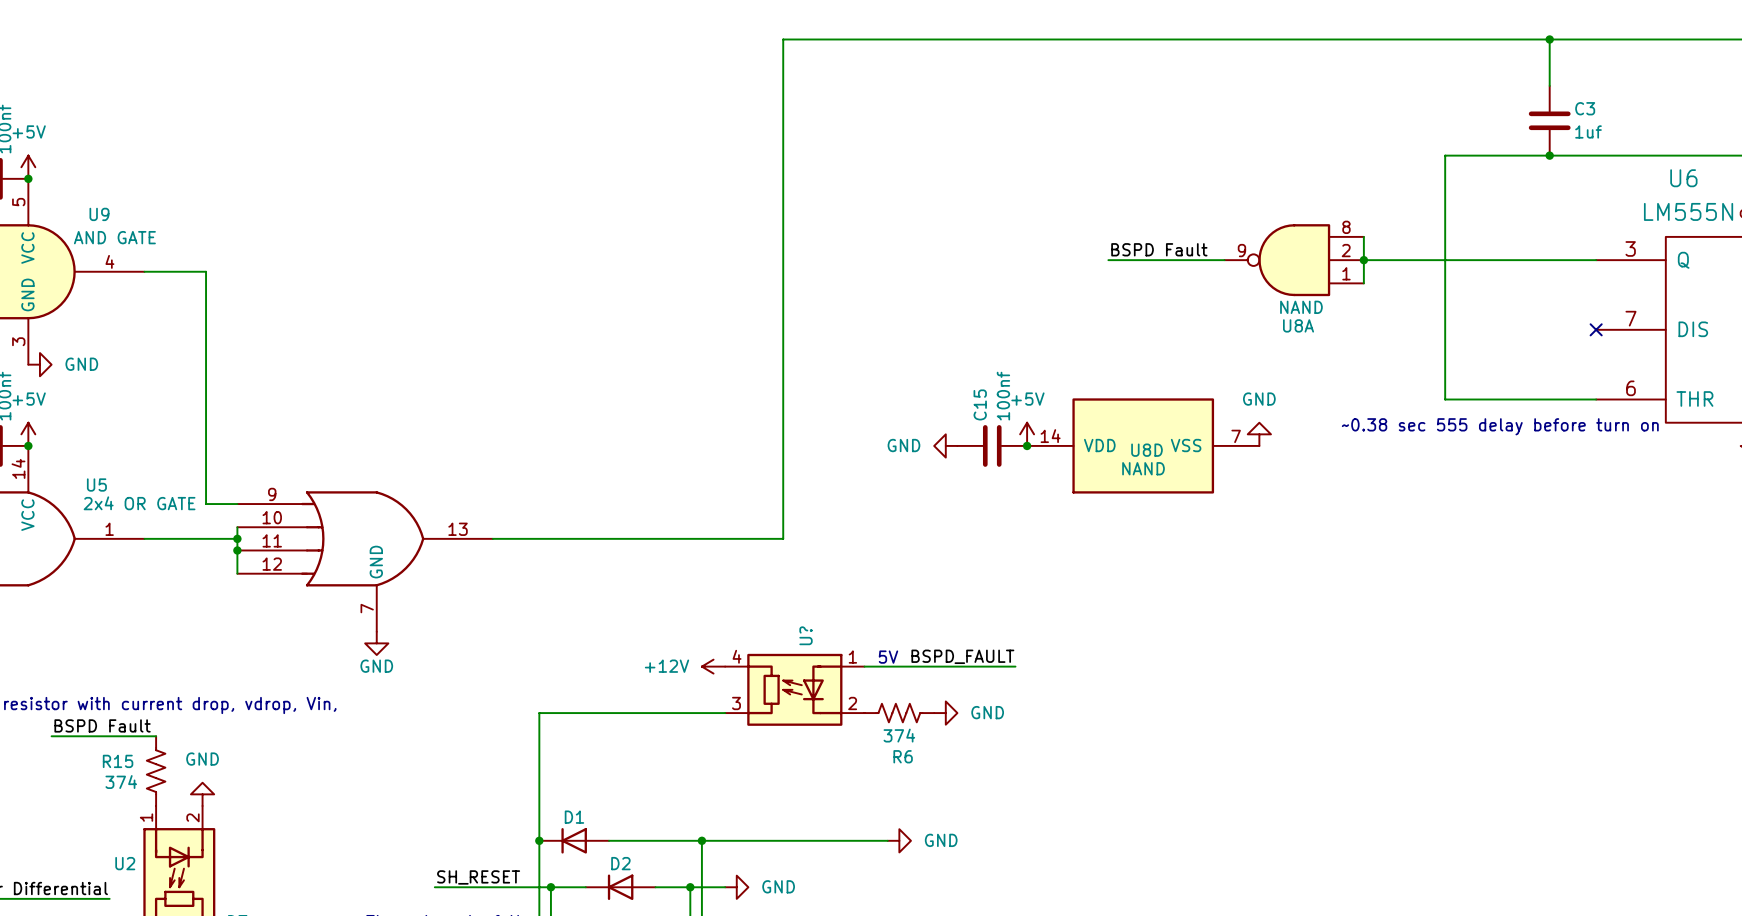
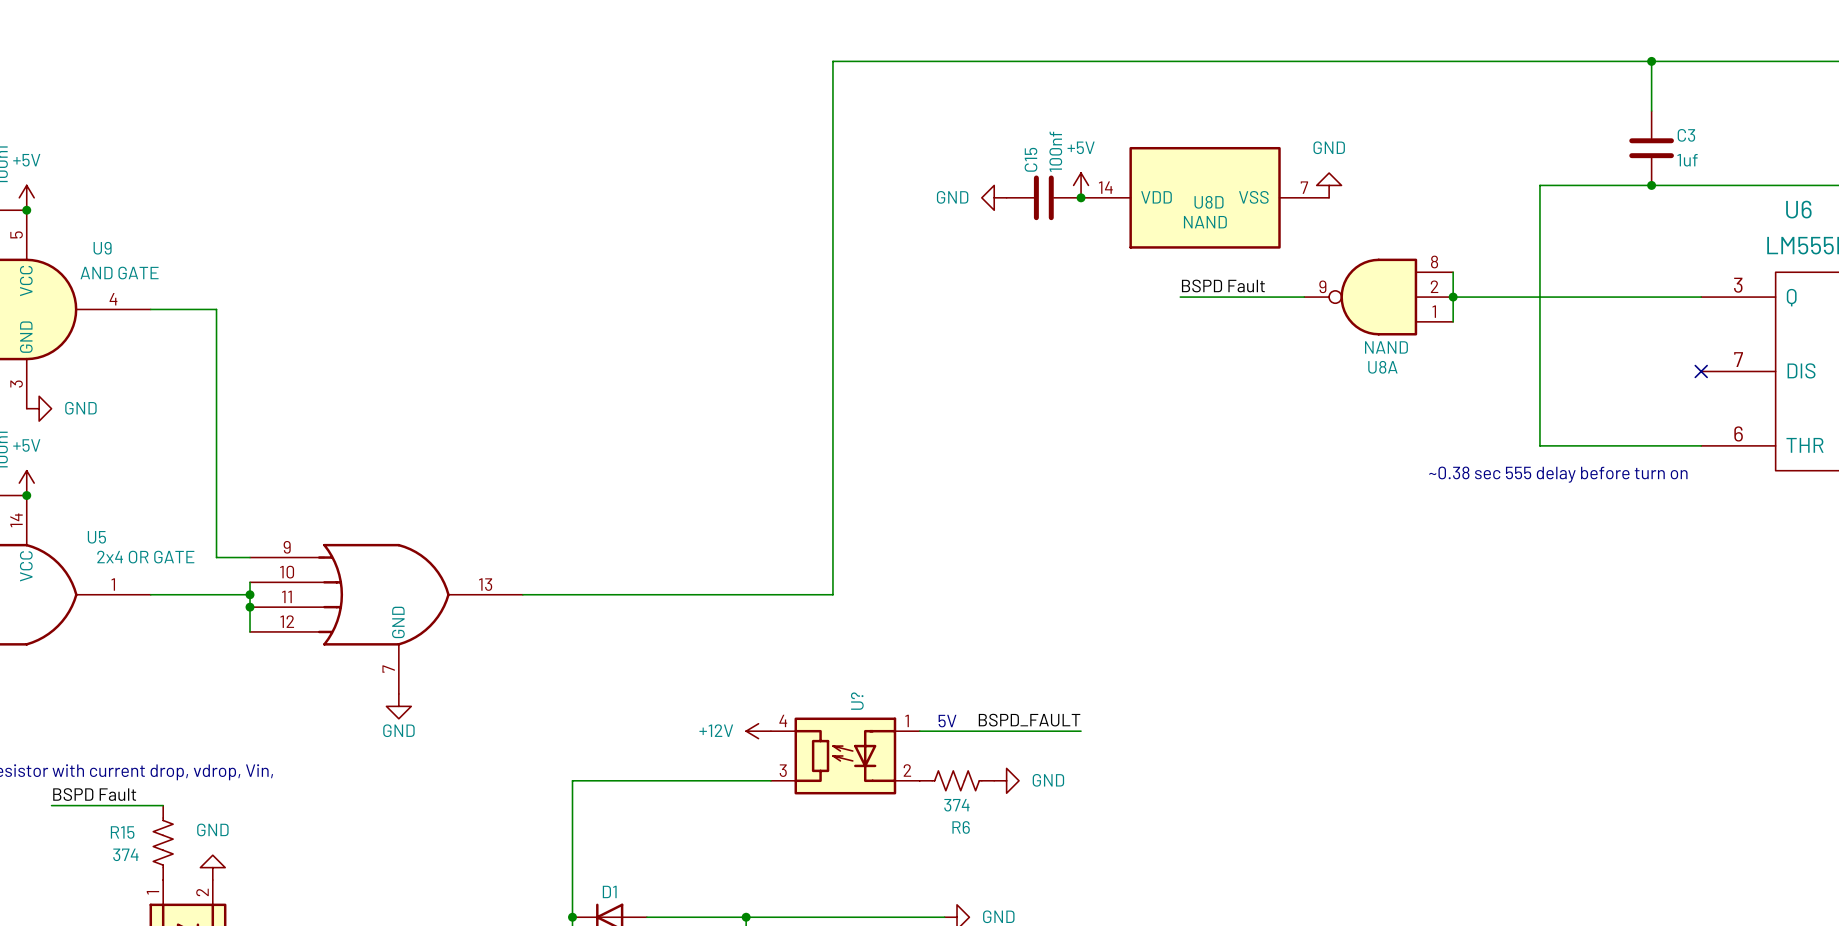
power symbol: none -> +5V (1081, 185)
power symbol: none -> GND (1329, 185)
power symbol: none -> GND (994, 197)
junction: none -> (1081, 197)
power symbol: +5V (1027, 434) -> none
power symbol: GND (1259, 434) -> none
power symbol: GND (945, 445) -> none
C15 position: (992, 445) -> (1043, 197)
junction: (1027, 445) -> none
U8D position: (1143, 445) -> (1205, 197)

